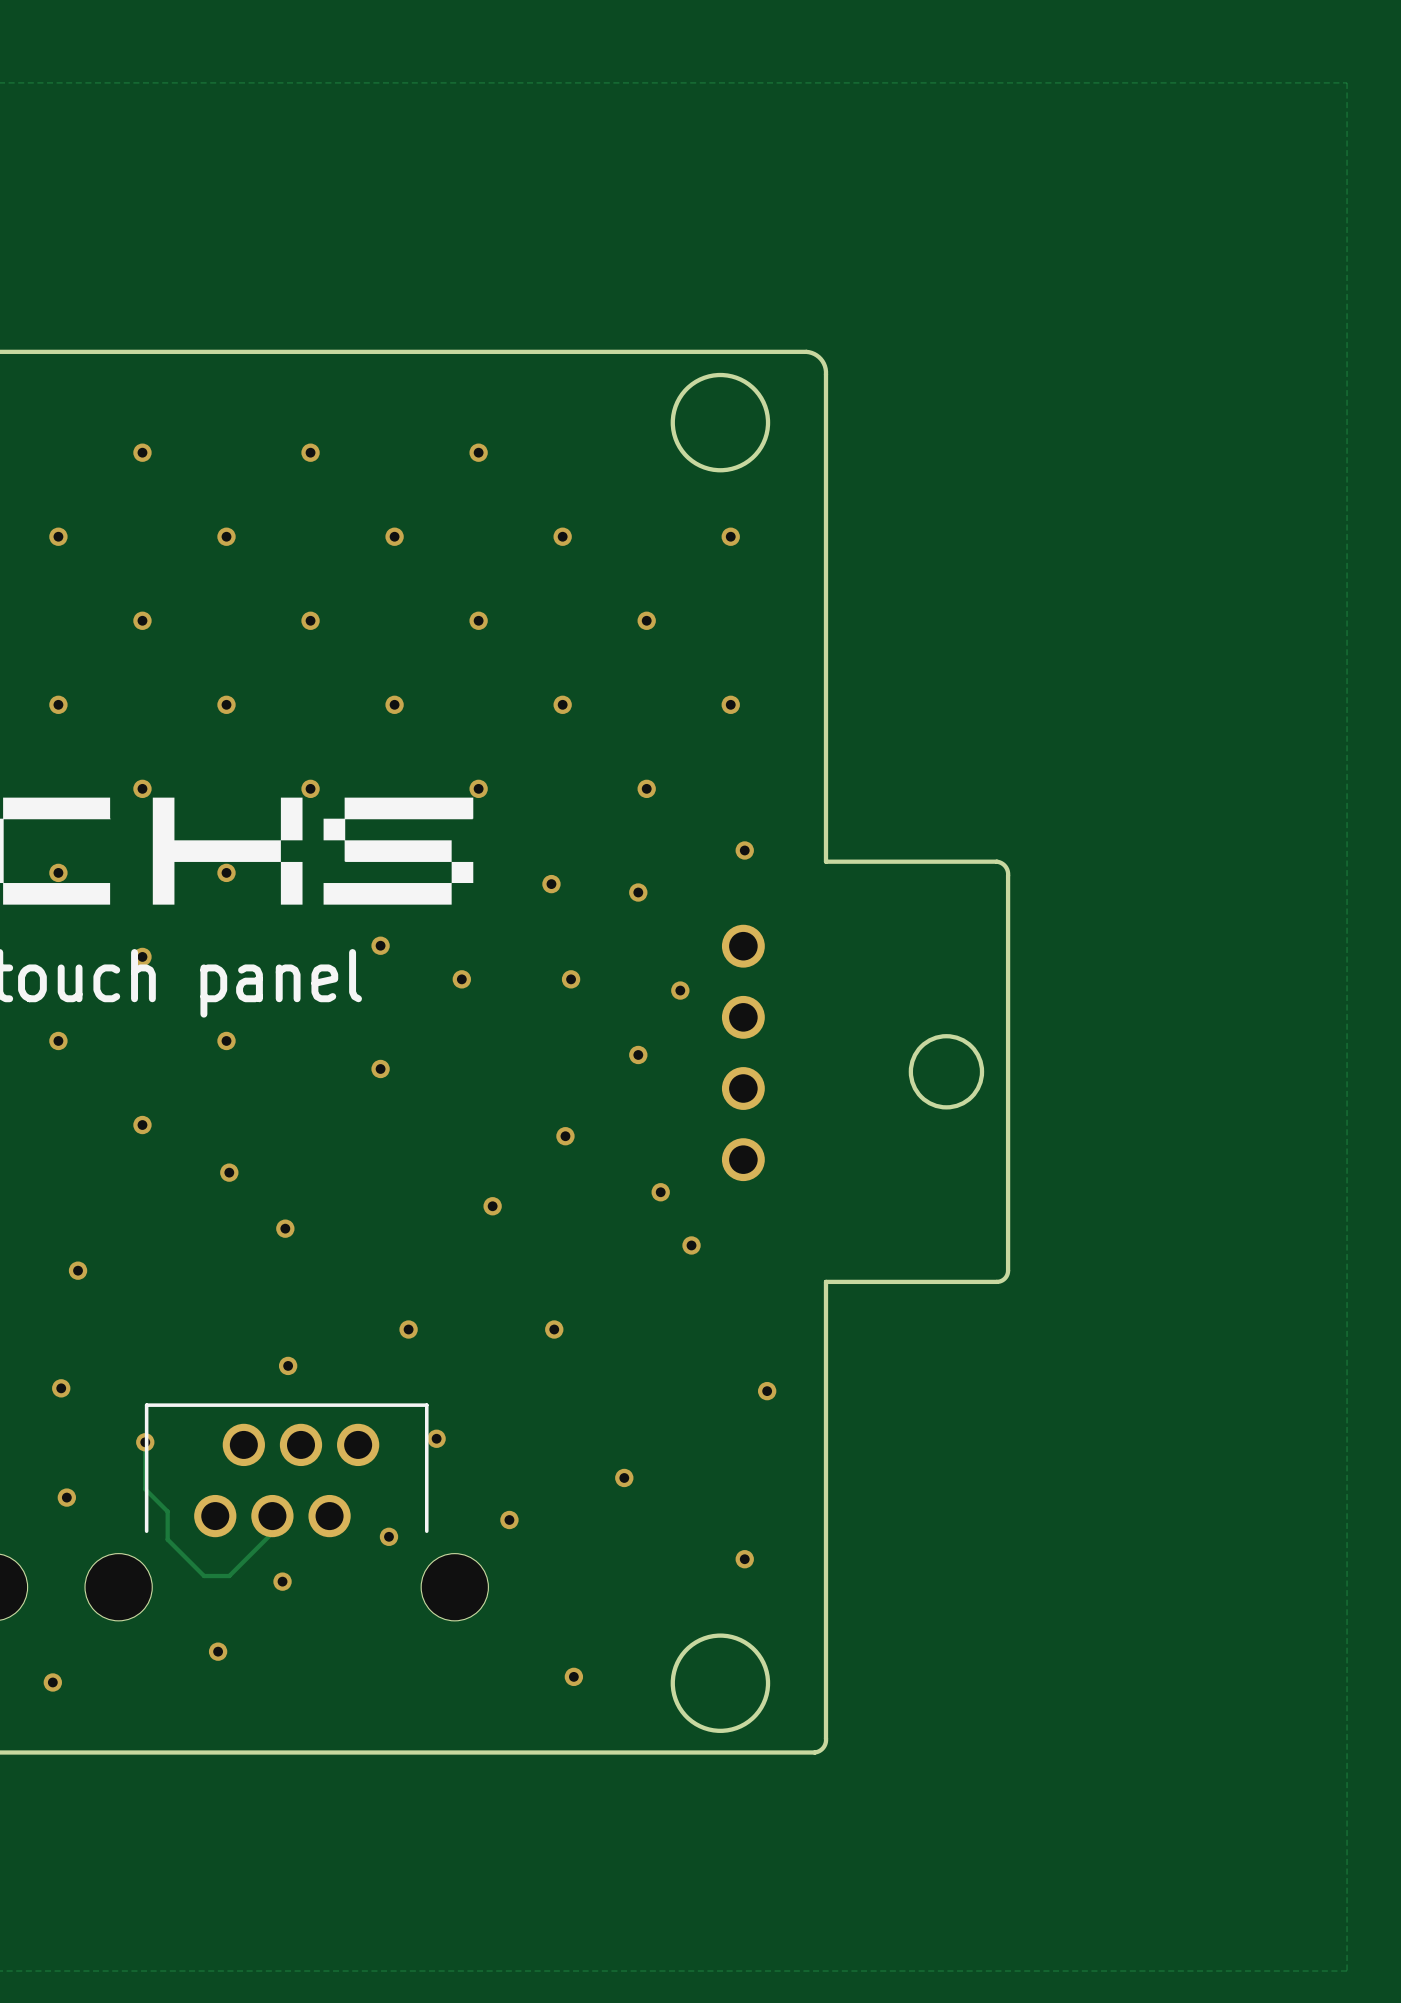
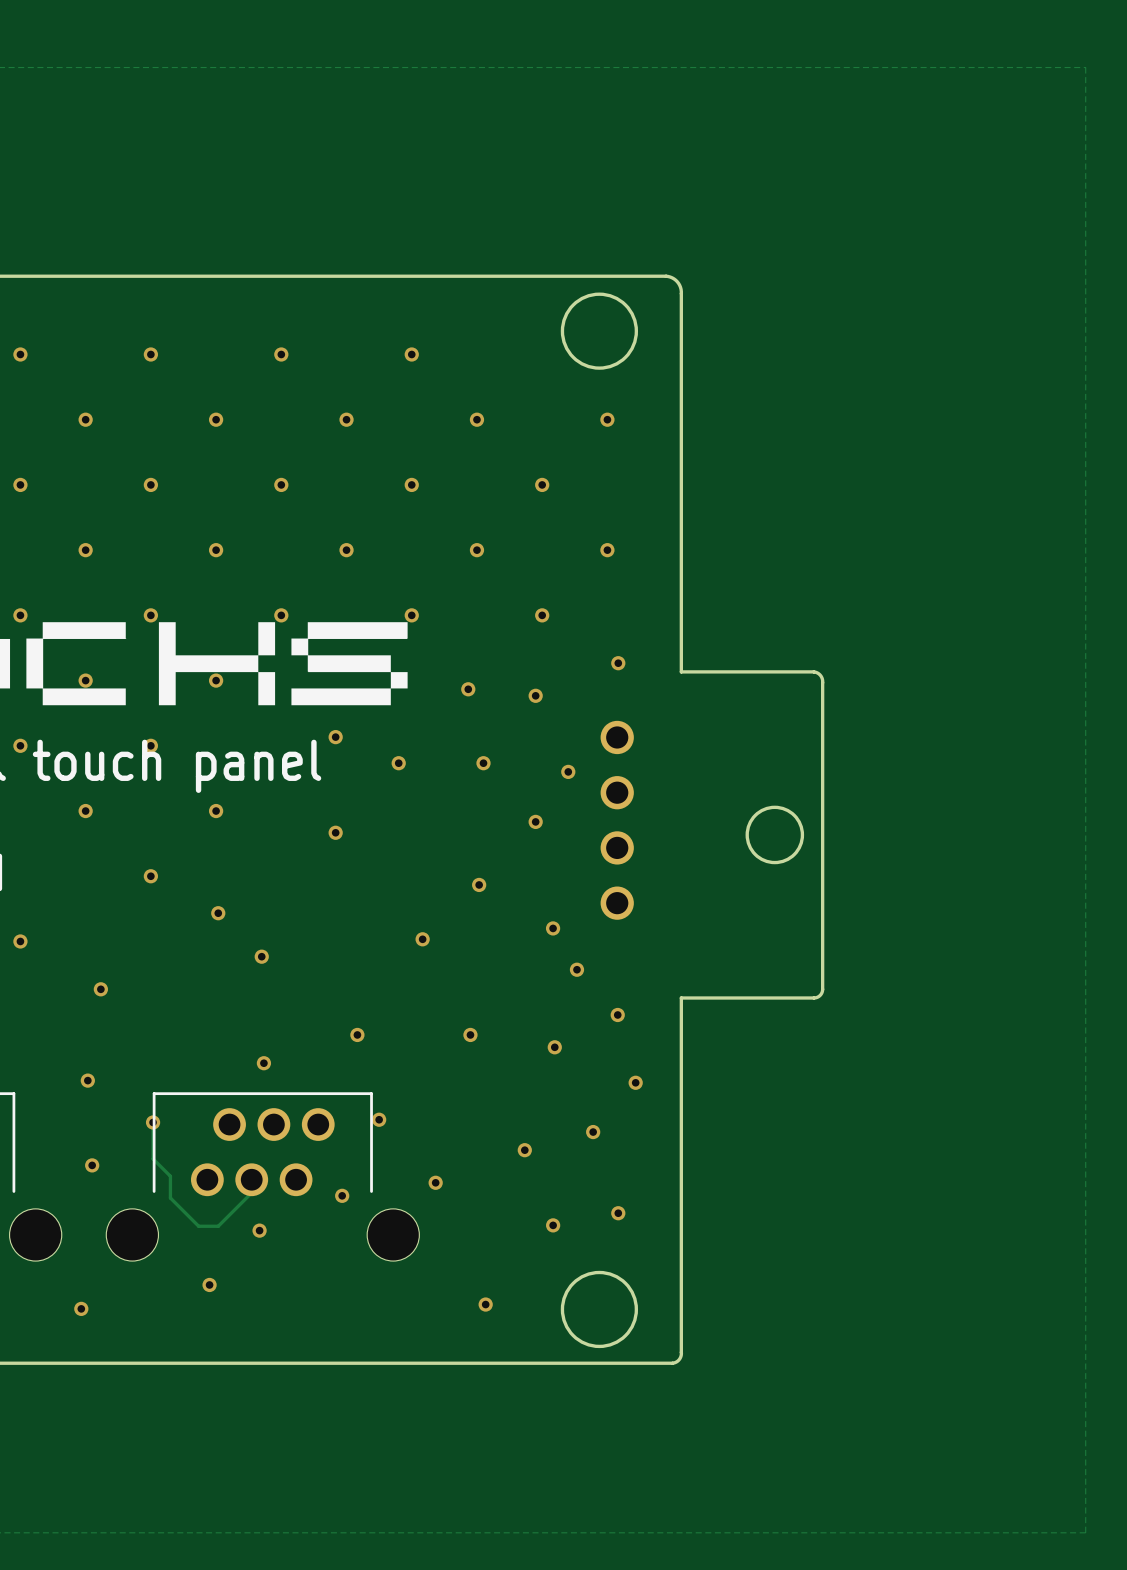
via: none -> (617, 1014)
via: none -> (554, 1047)
via: none -> (593, 1132)
via: none -> (553, 1225)

